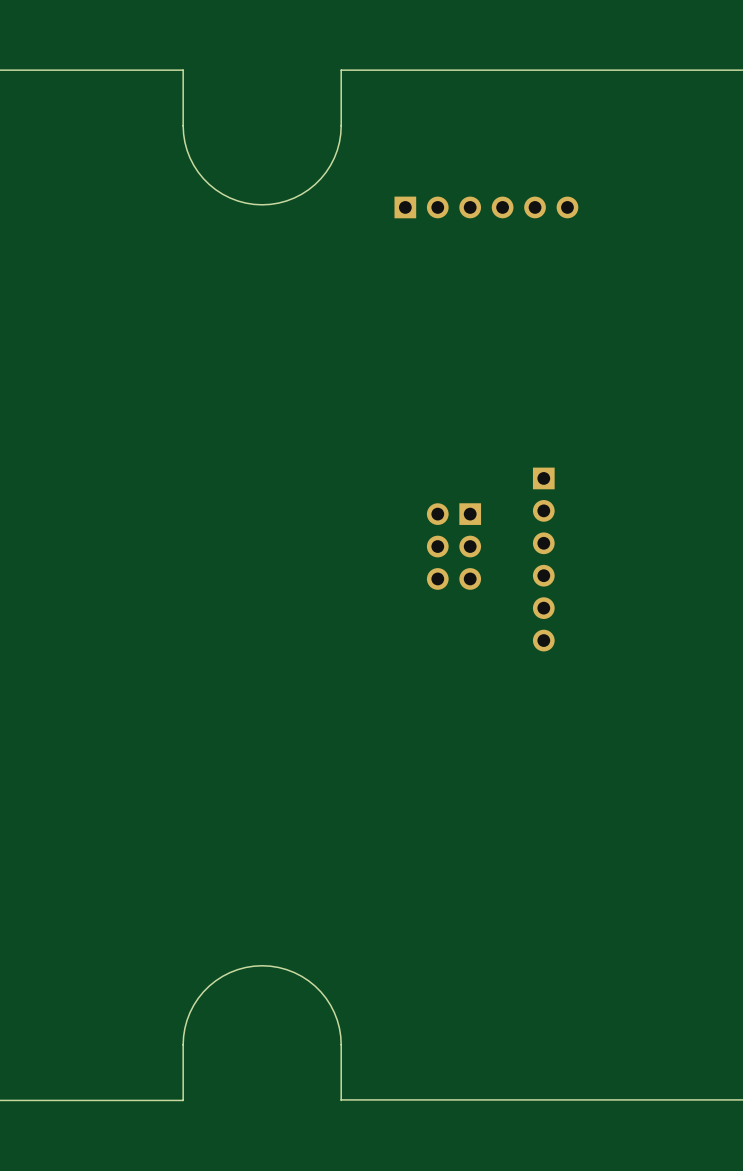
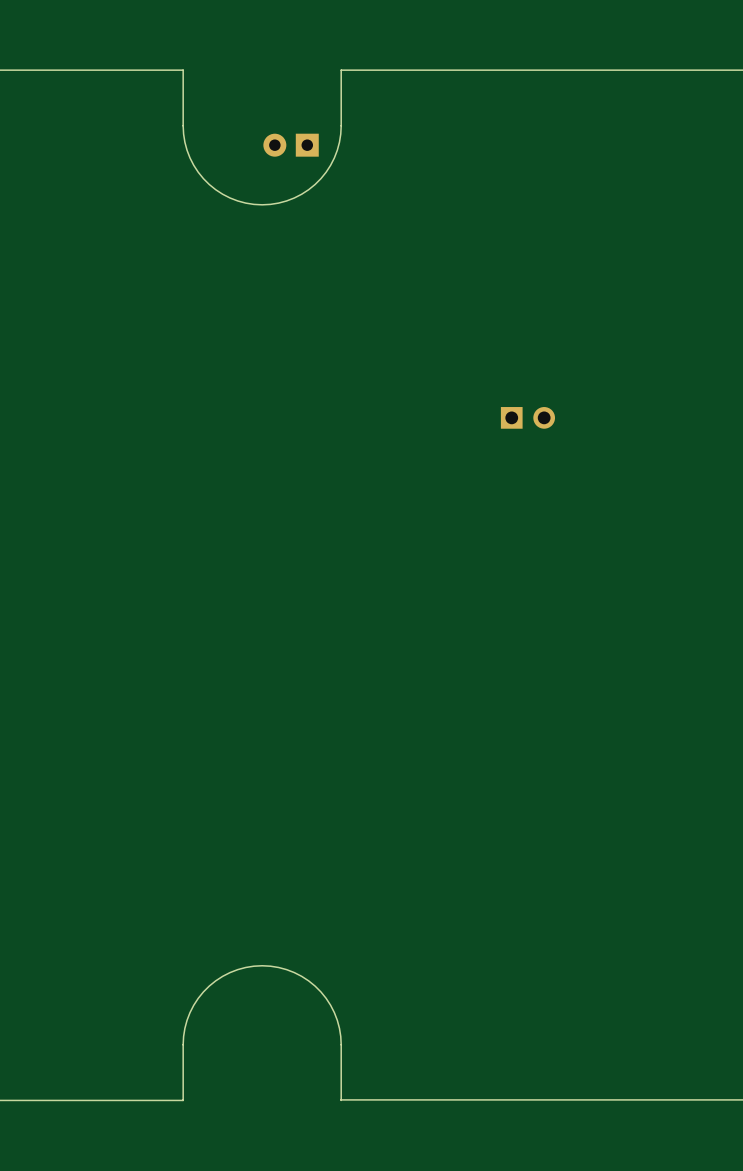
part: none -> (291, 145)
part: (486, 207) -> none
part: none -> (527, 417)
part: (453, 546) -> none
part: (543, 559) -> none

